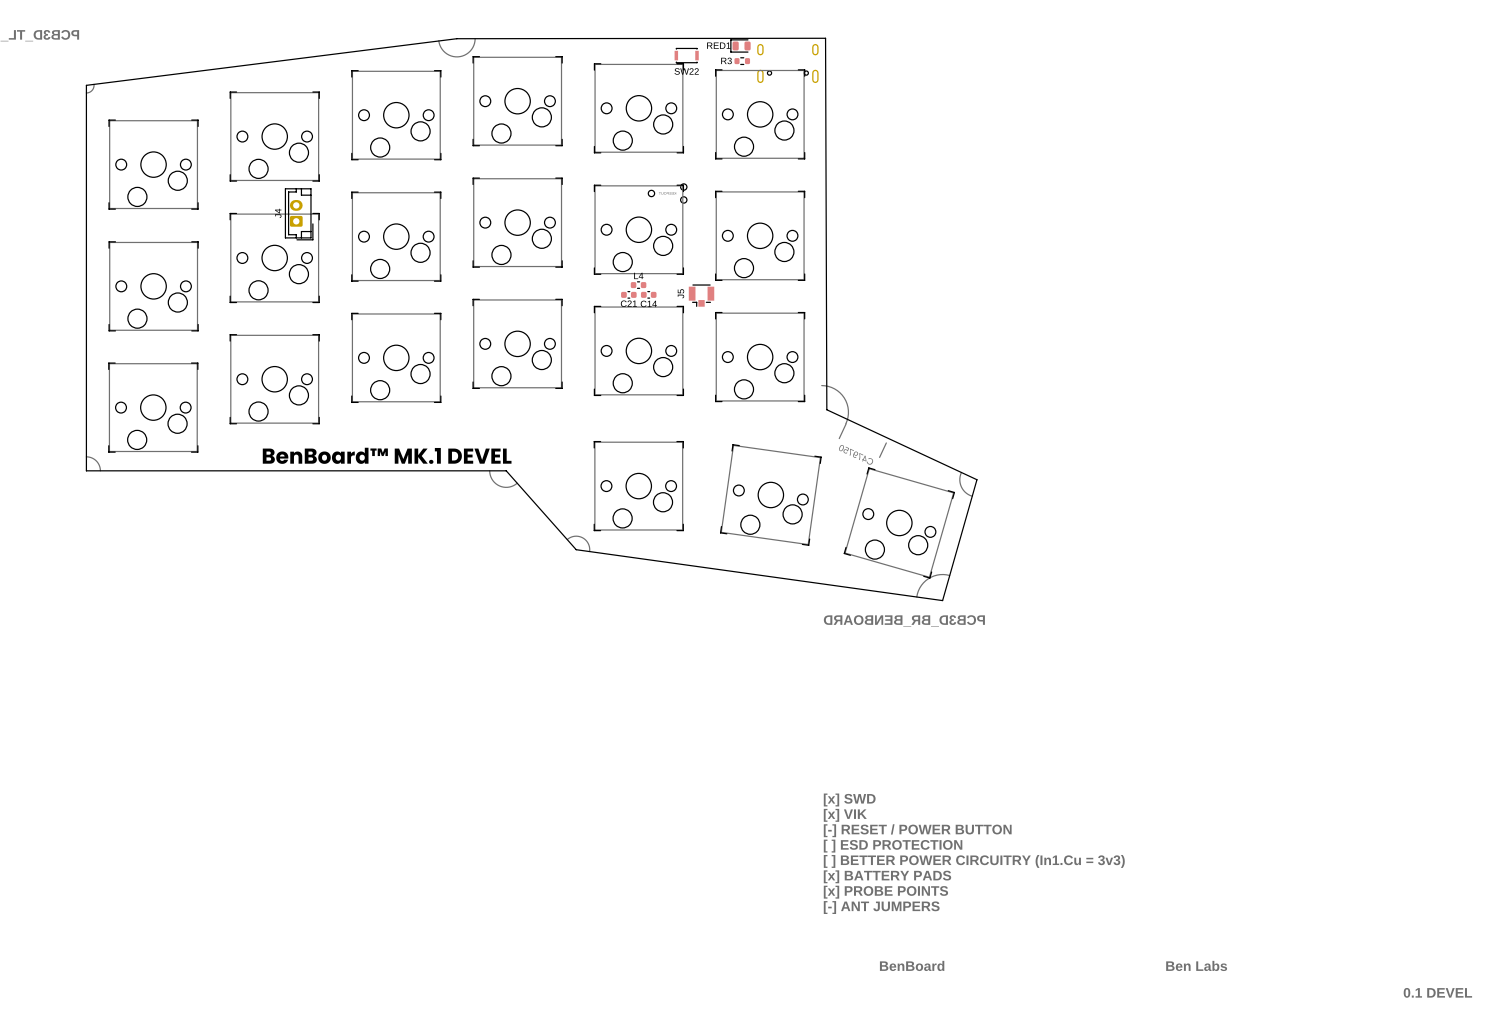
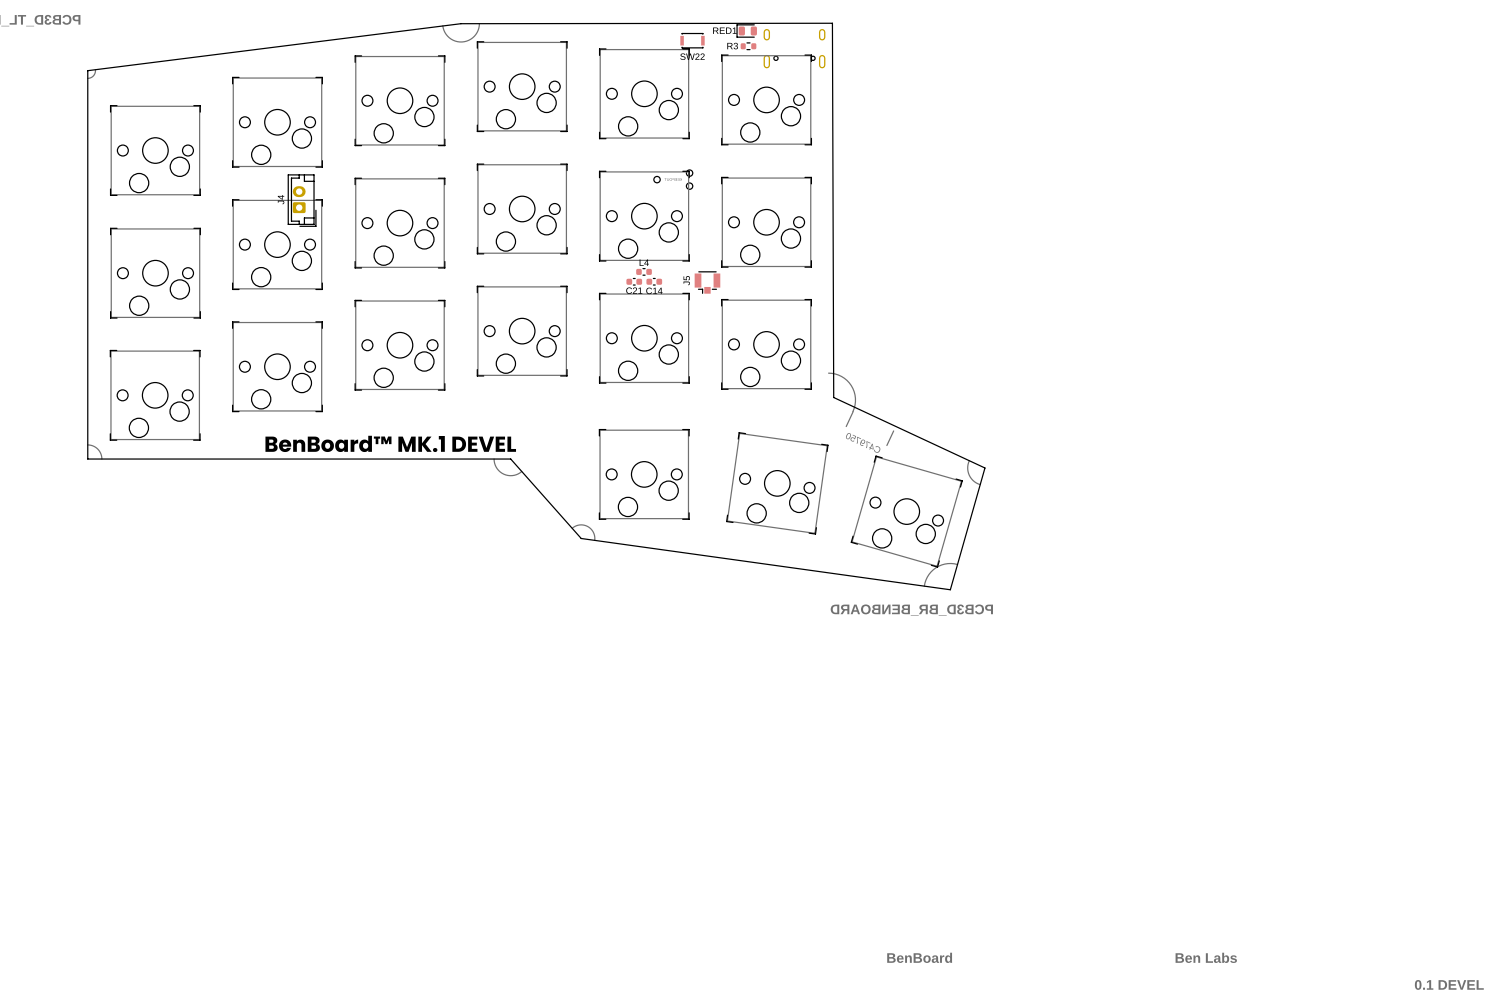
text: [x] SWD (849, 799) -> none
text: [x] VIK (845, 815) -> none
text: [-] RESET / POWER BUTTON (917, 830) -> none
text: [ ] ESD PROTECTION (893, 846) -> none
text: [ ] BETTER POWER CIRCUITRY (In1.Cu = 3v3) (974, 861) -> none
text: [x] BATTERY PADS (887, 876) -> none
text: [x] PROBE POINTS (885, 892) -> none
text: [-] ANT JUMPERS (881, 907) -> none

